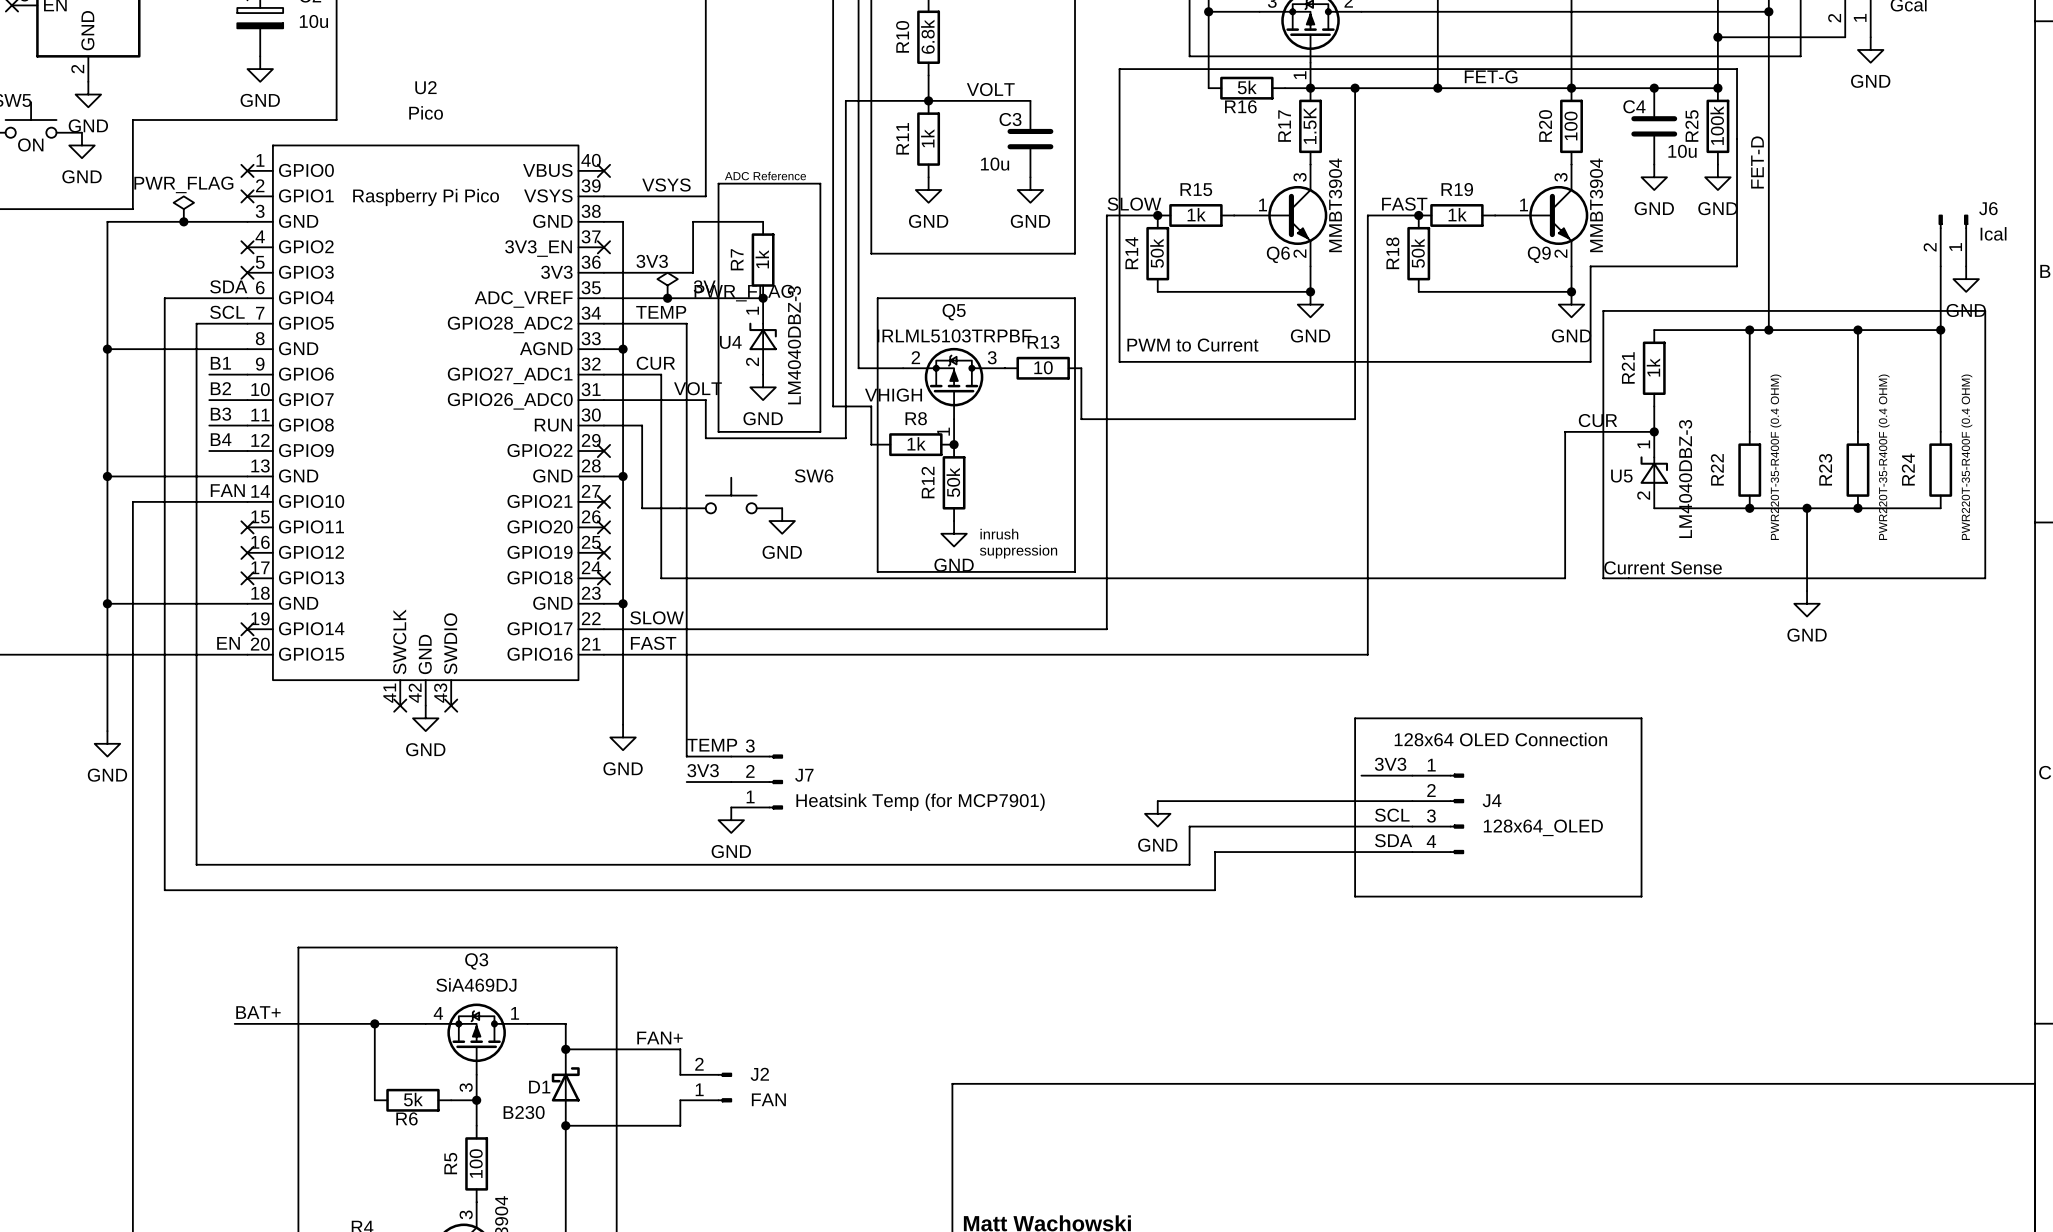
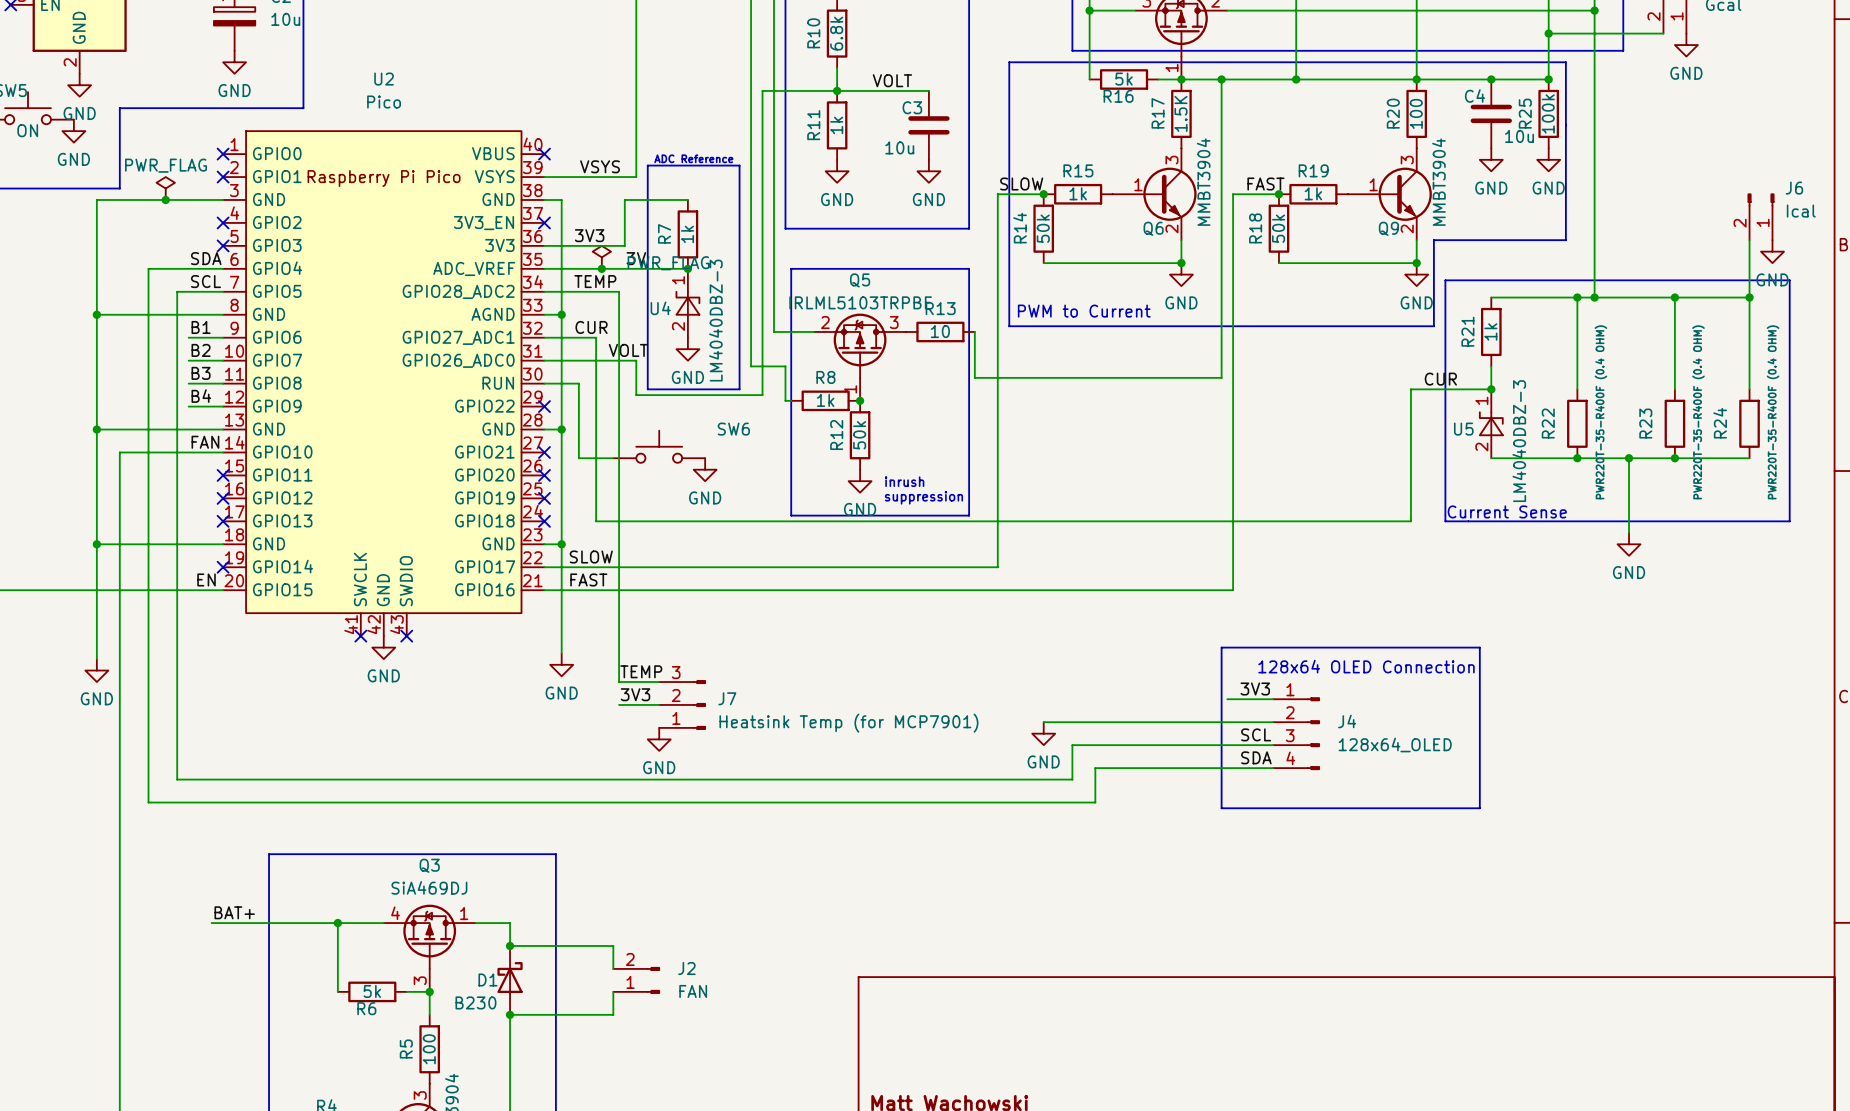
label: FET-G (1491, 76) -> none
label: FET-D (1757, 162) -> none
label: VHIGH (893, 395) -> none
label: FAN+ (659, 1038) -> none

